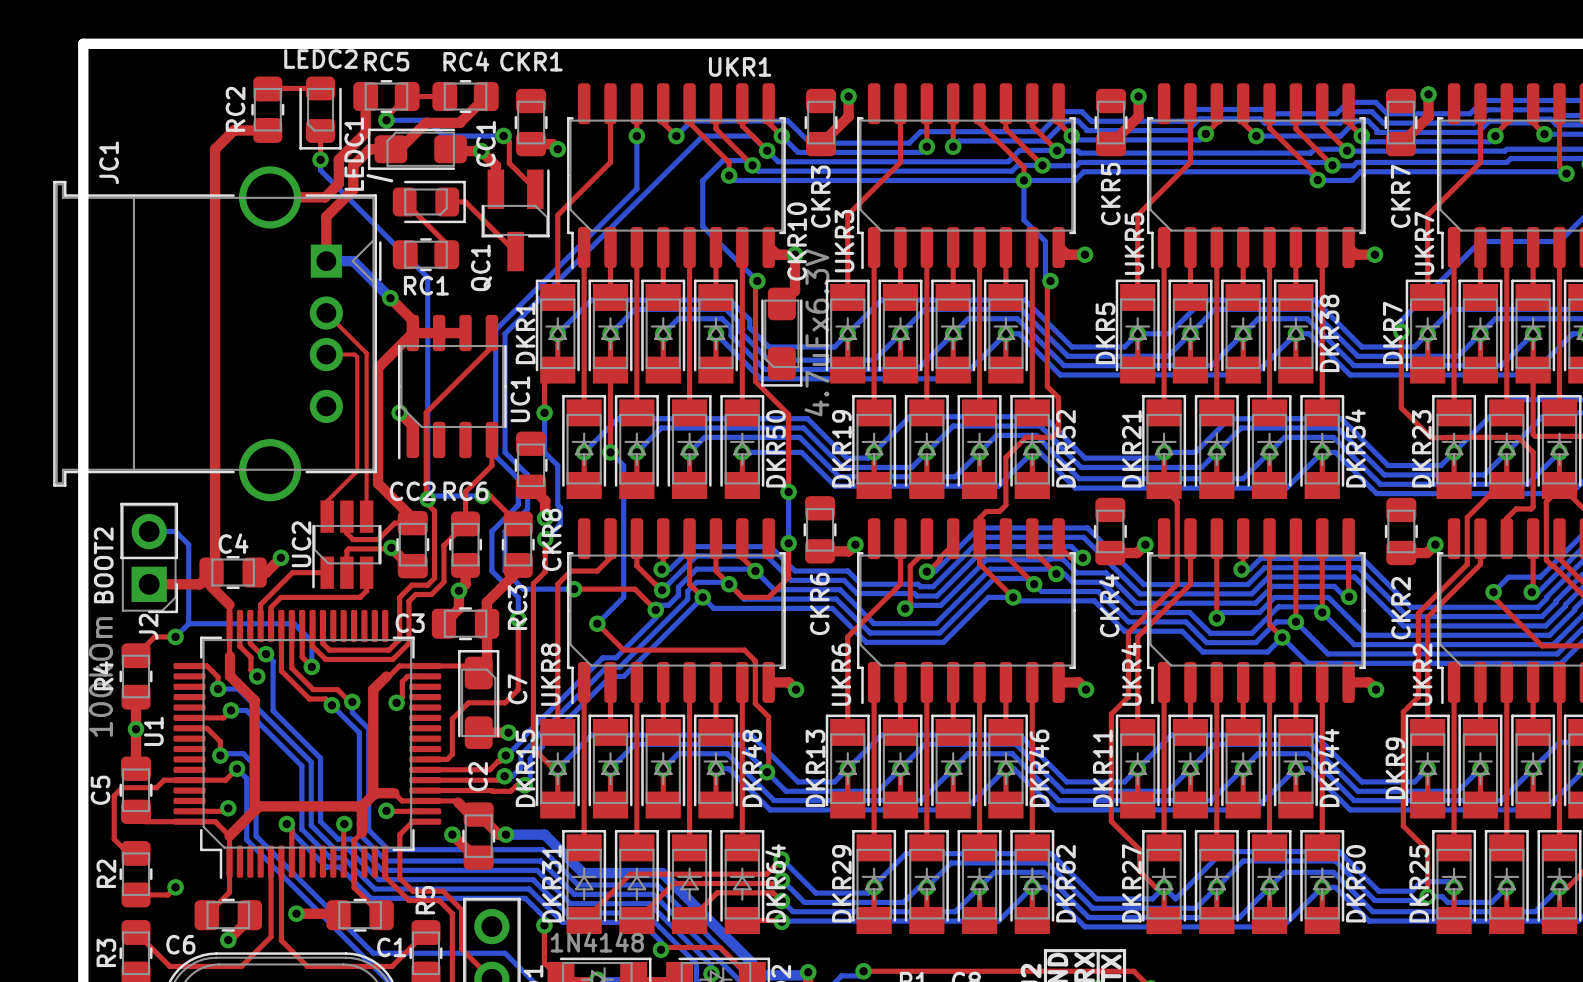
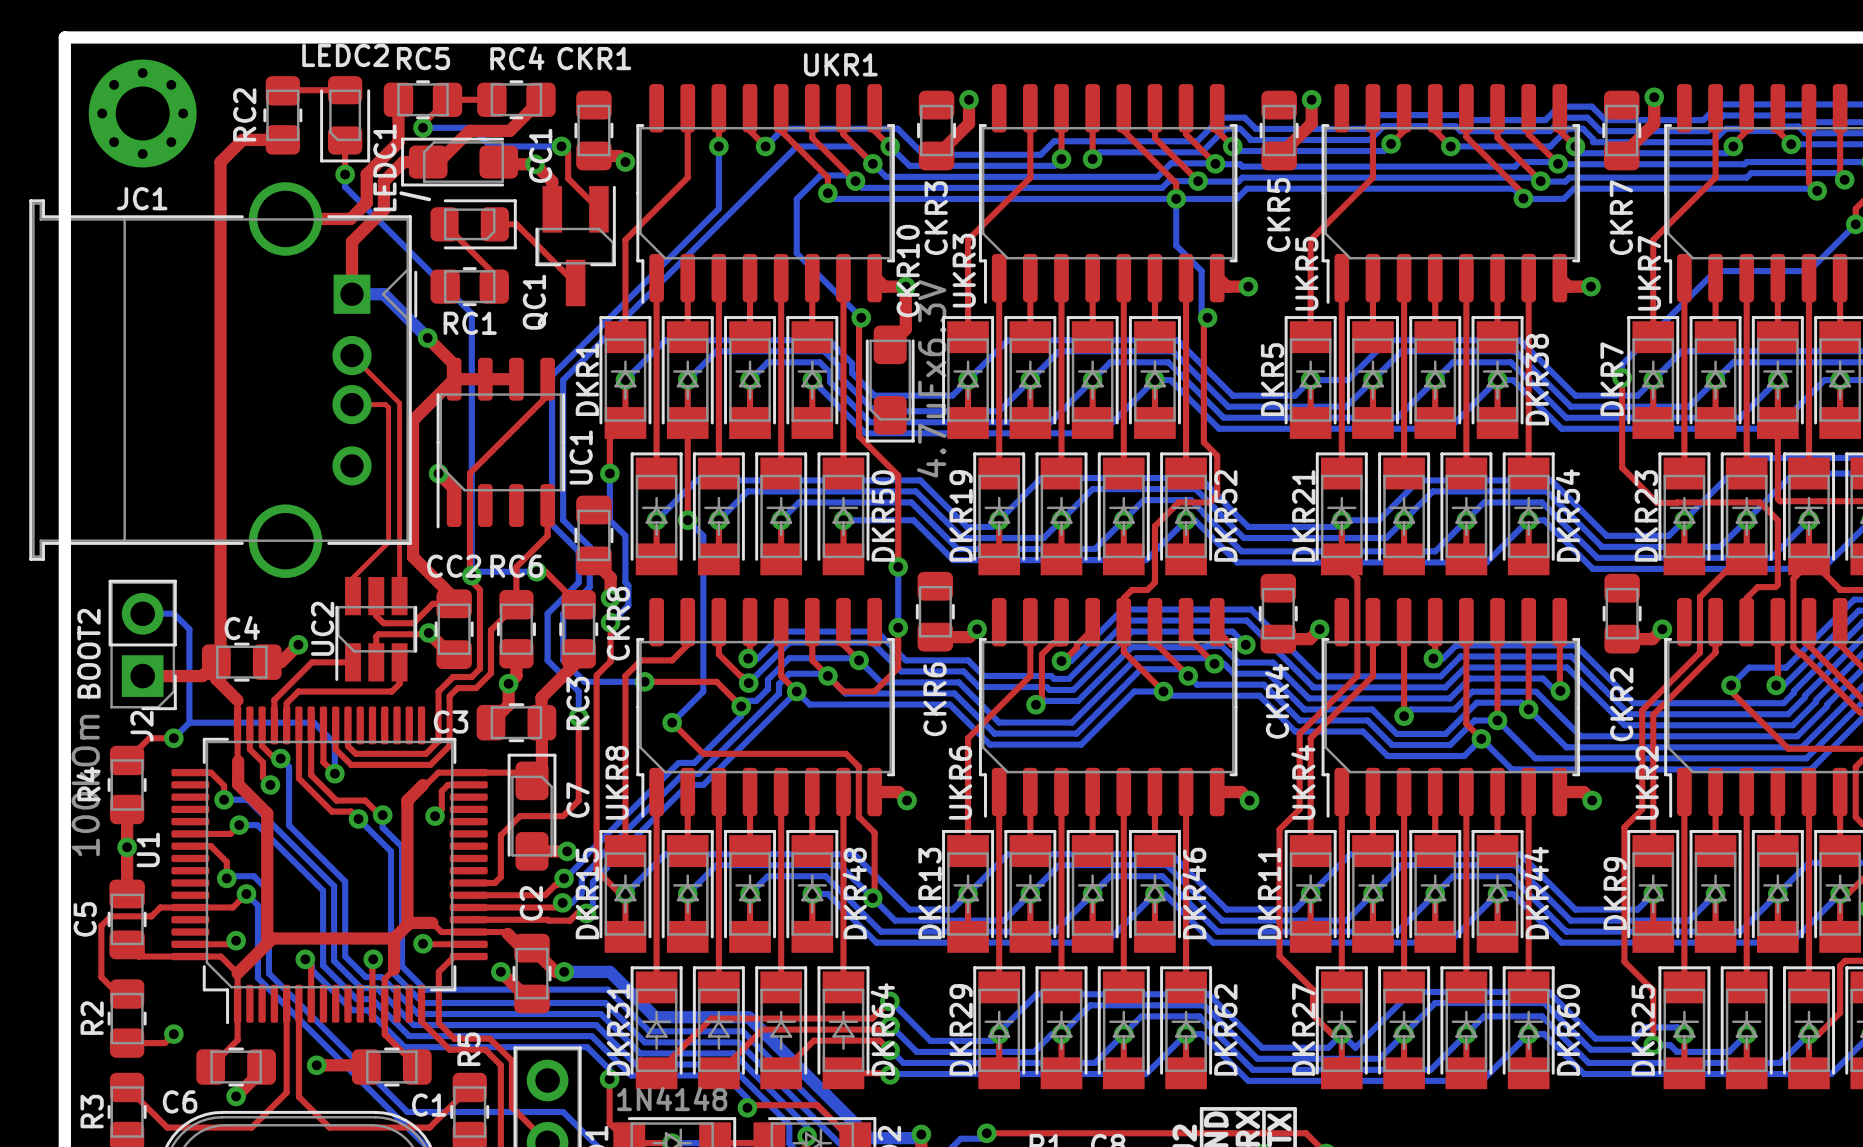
part: none -> (142, 113)
JC1 name rotation: 0° (109, 162) -> 90° clockwise (142, 198)

